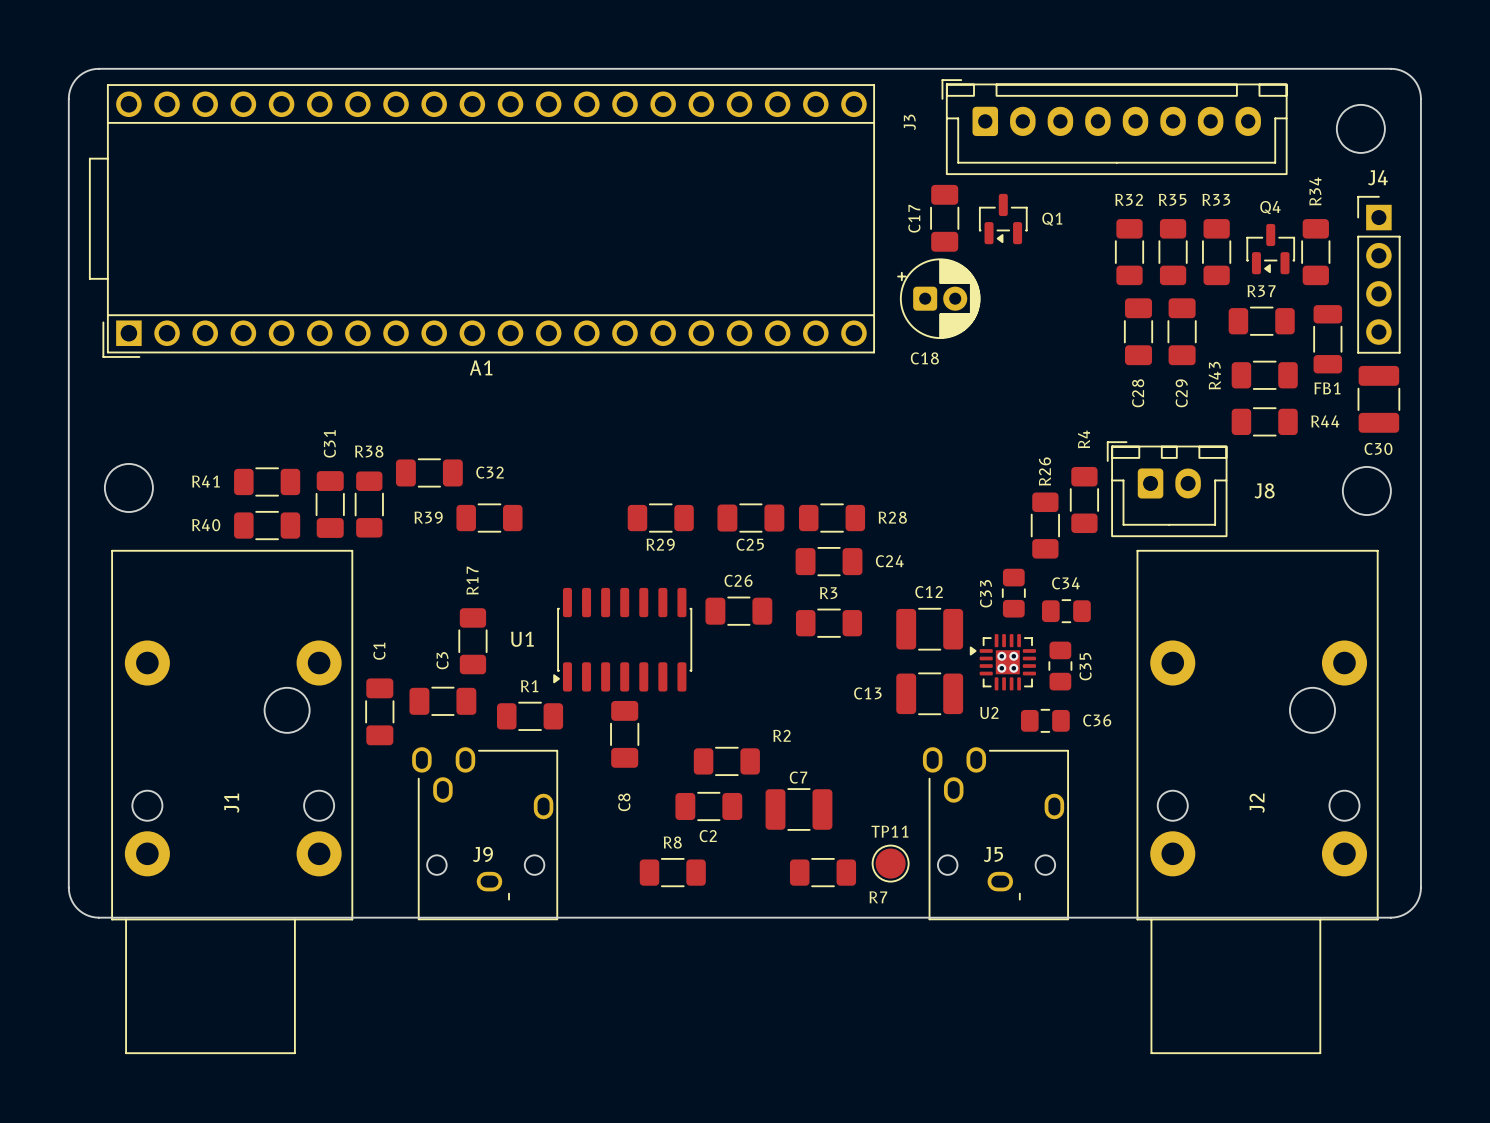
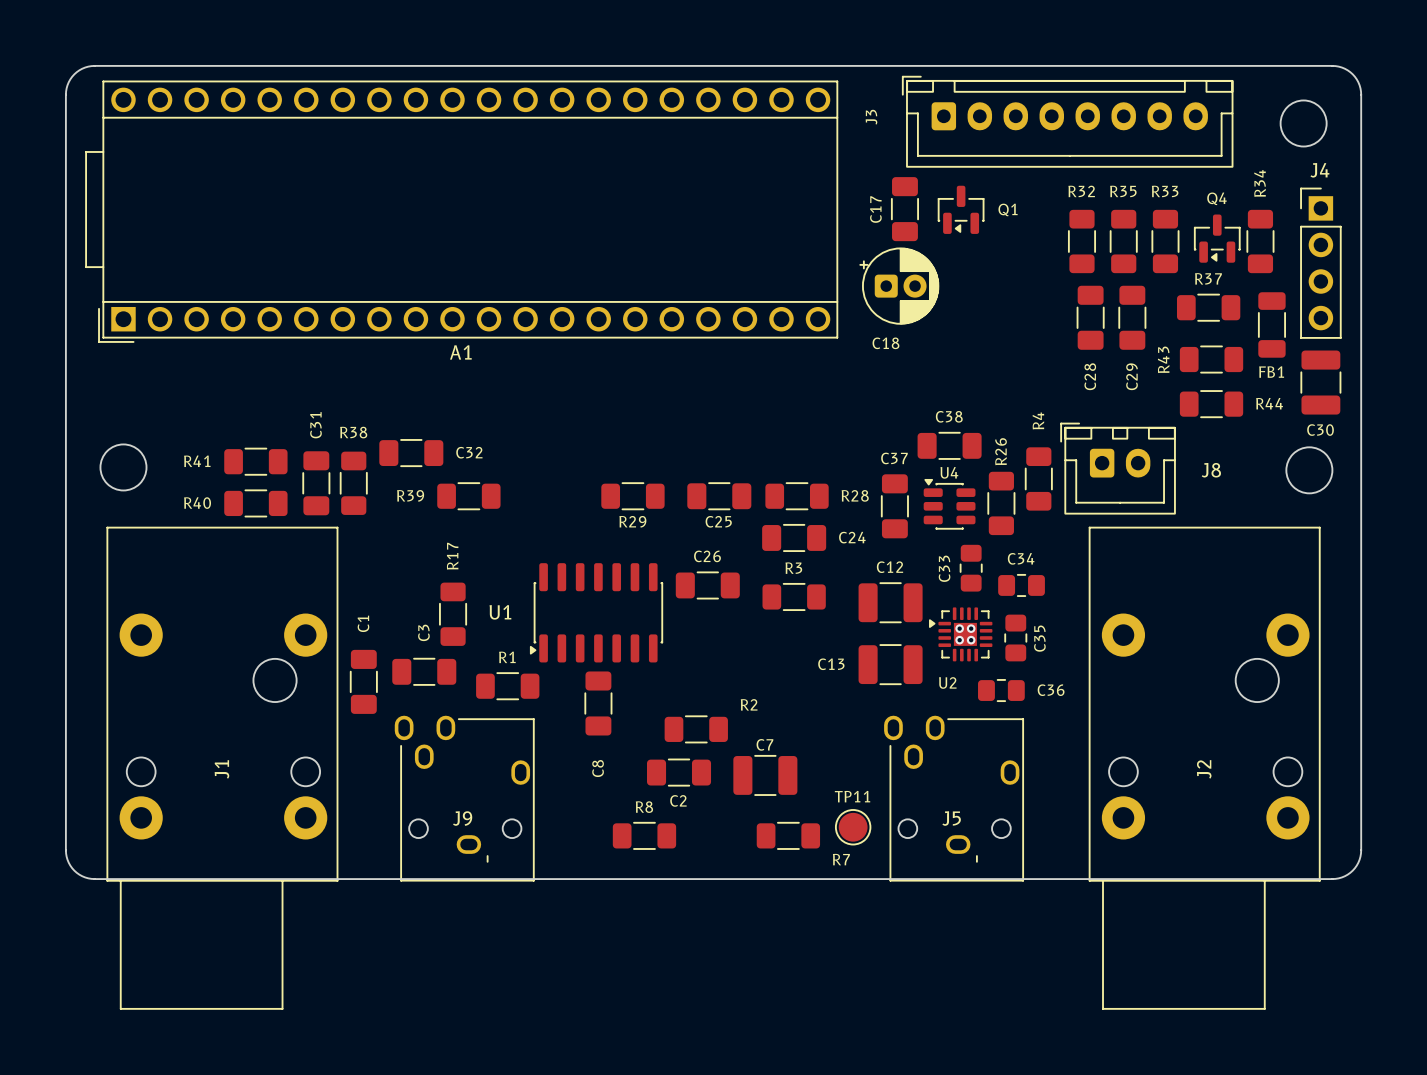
C38: none -> (949, 445)
U4: none -> (949, 504)
C37: none -> (894, 506)

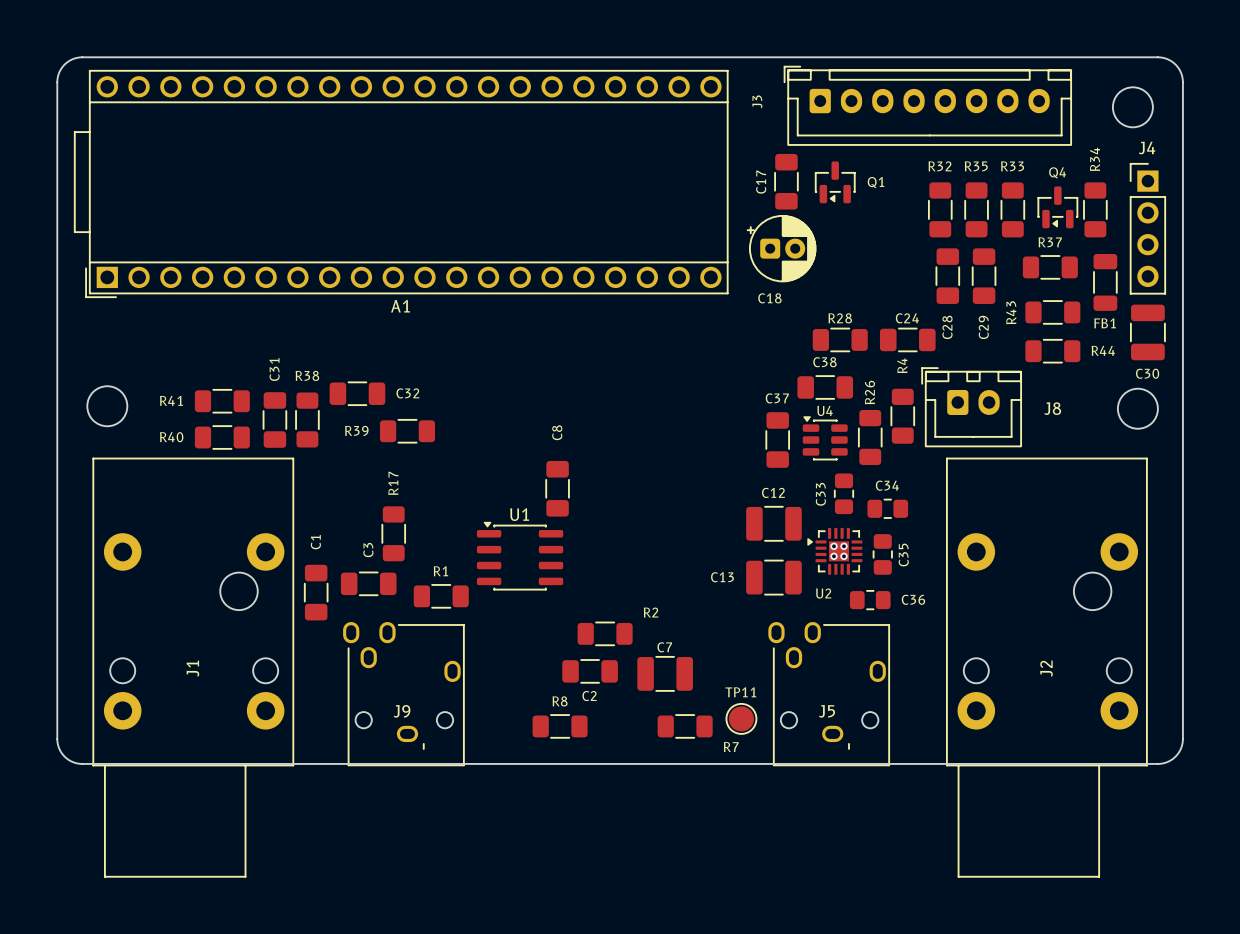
R28 name position: R28 (855, 495) -> R28 (840, 318)
R29: (632, 496) -> none
C25: (719, 496) -> none
R28 position: (797, 496) -> (840, 339)
C24 position: (794, 537) -> (907, 339)
C24 name position: C24 (852, 537) -> C24 (907, 318)
U1 footprint: [529, 563, 664, 663] -> [476, 521, 564, 591]
C26: (707, 585) -> none
R3: (794, 596) -> none
U1 name position: U1 (500, 612) -> U1 (519, 514)
C8 position: (598, 703) -> (557, 488)
C8 name position: C8 (598, 768) -> C8 (557, 432)

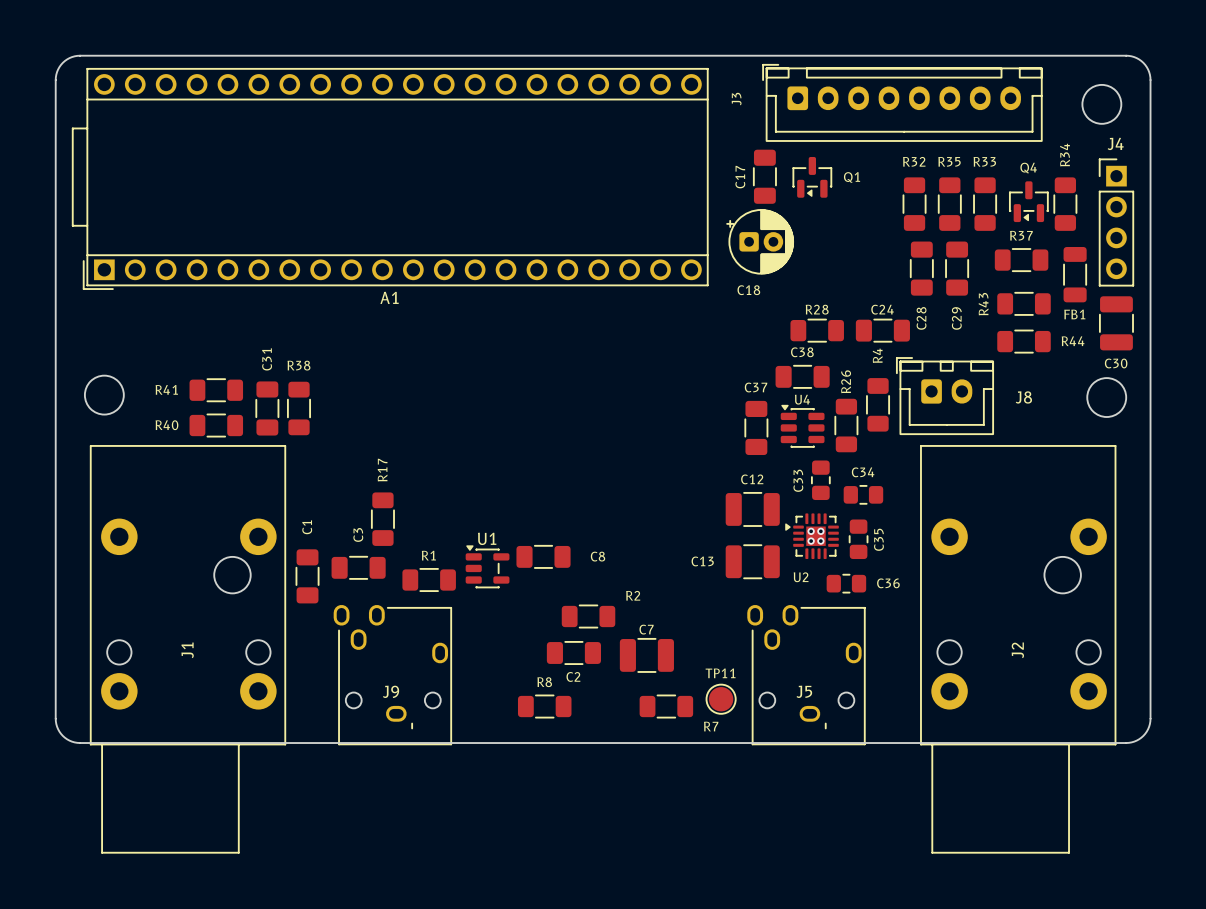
C32: (357, 393) -> none
R39: (407, 431) -> none
C8 rotation: 0° (557, 488) -> 90° clockwise (543, 556)
C8 position: (557, 488) -> (543, 556)
U1 footprint: [476, 521, 564, 591] -> [465, 545, 510, 589]

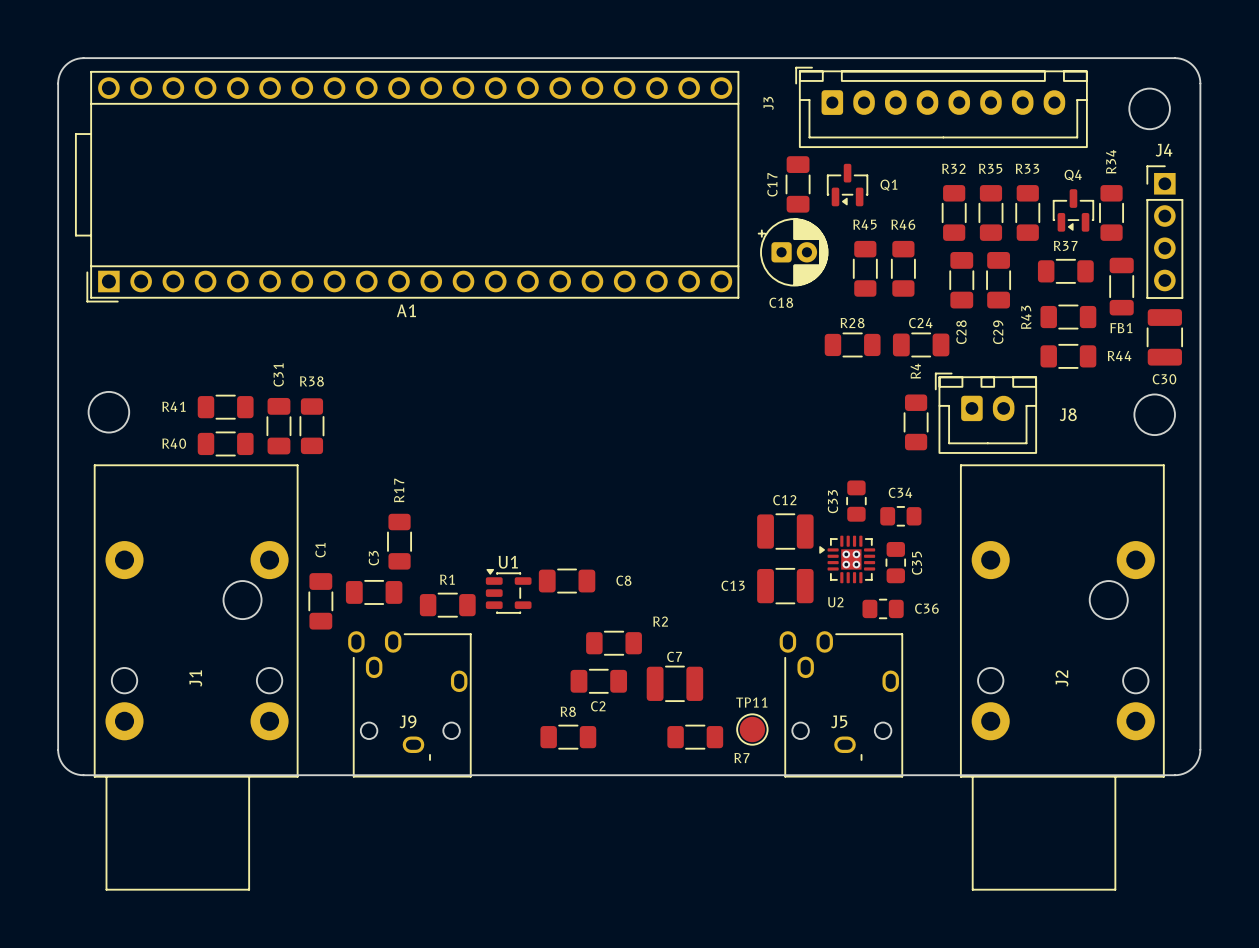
R45: none -> (865, 268)
R46: none -> (903, 268)
C38: (802, 376) -> none
R26: (846, 425) -> none
U4: (802, 426) -> none
C37: (756, 427) -> none

